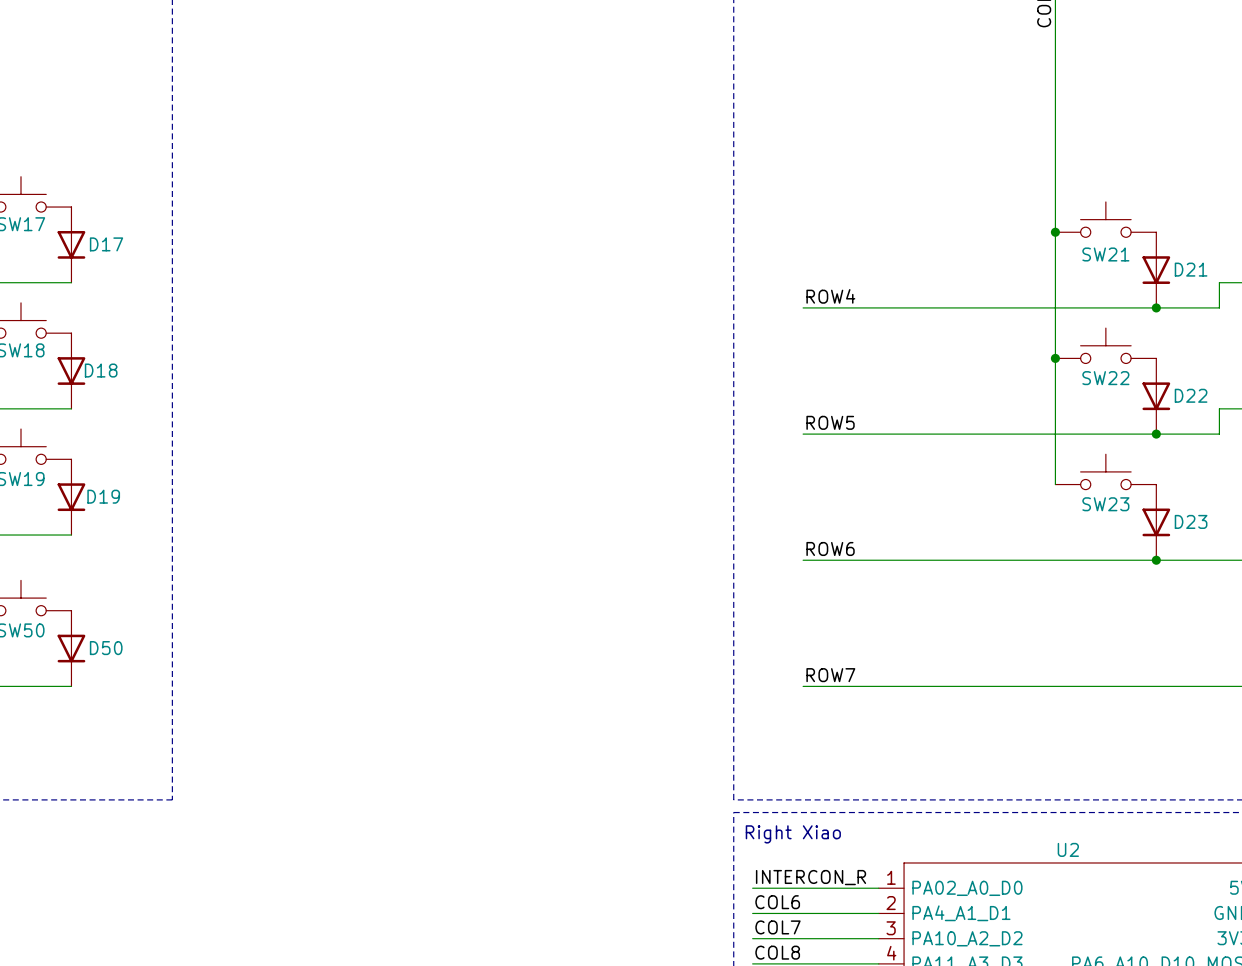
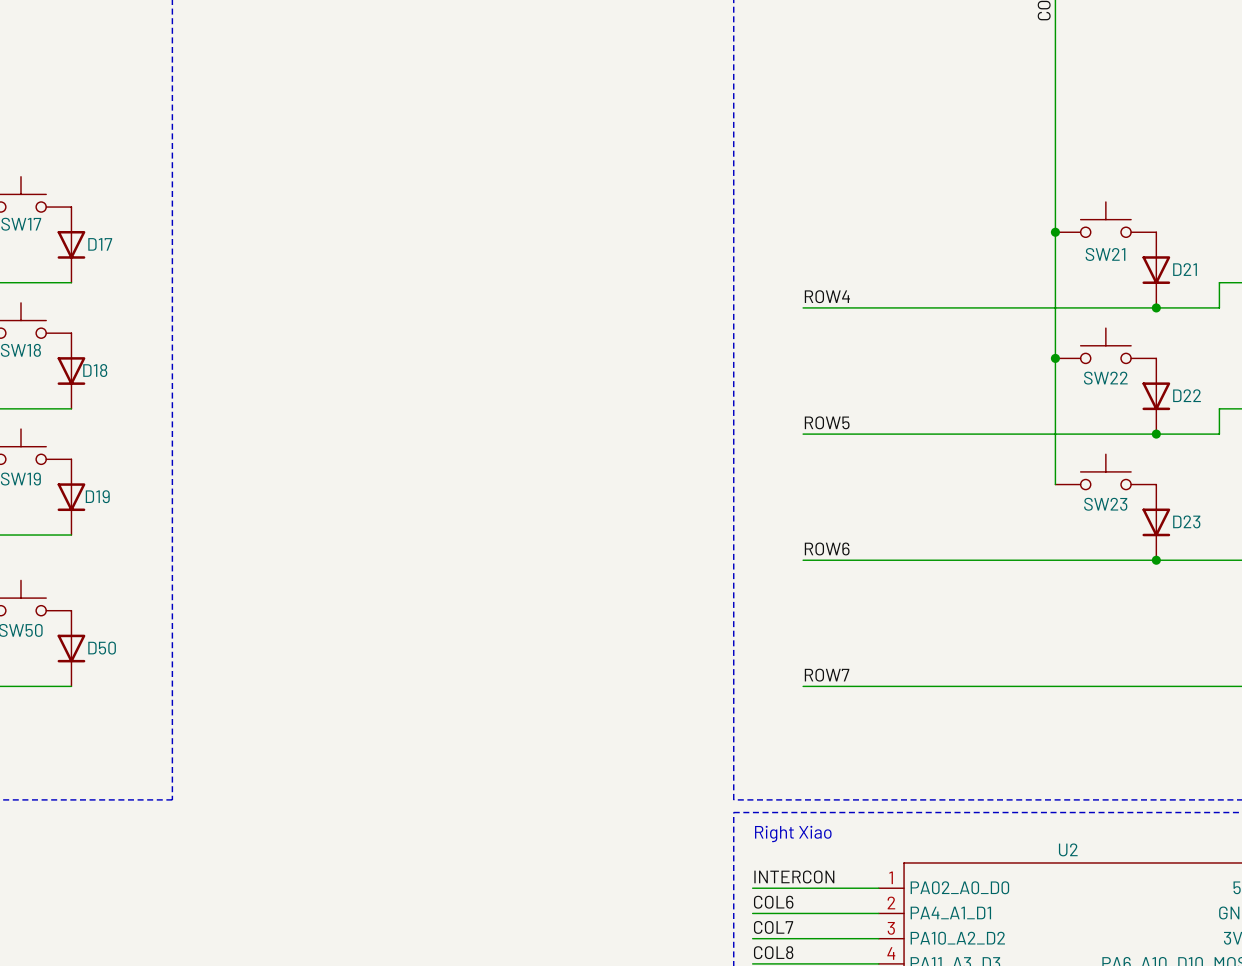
label: INTERCON_R (811, 877) -> INTERCON (794, 876)

